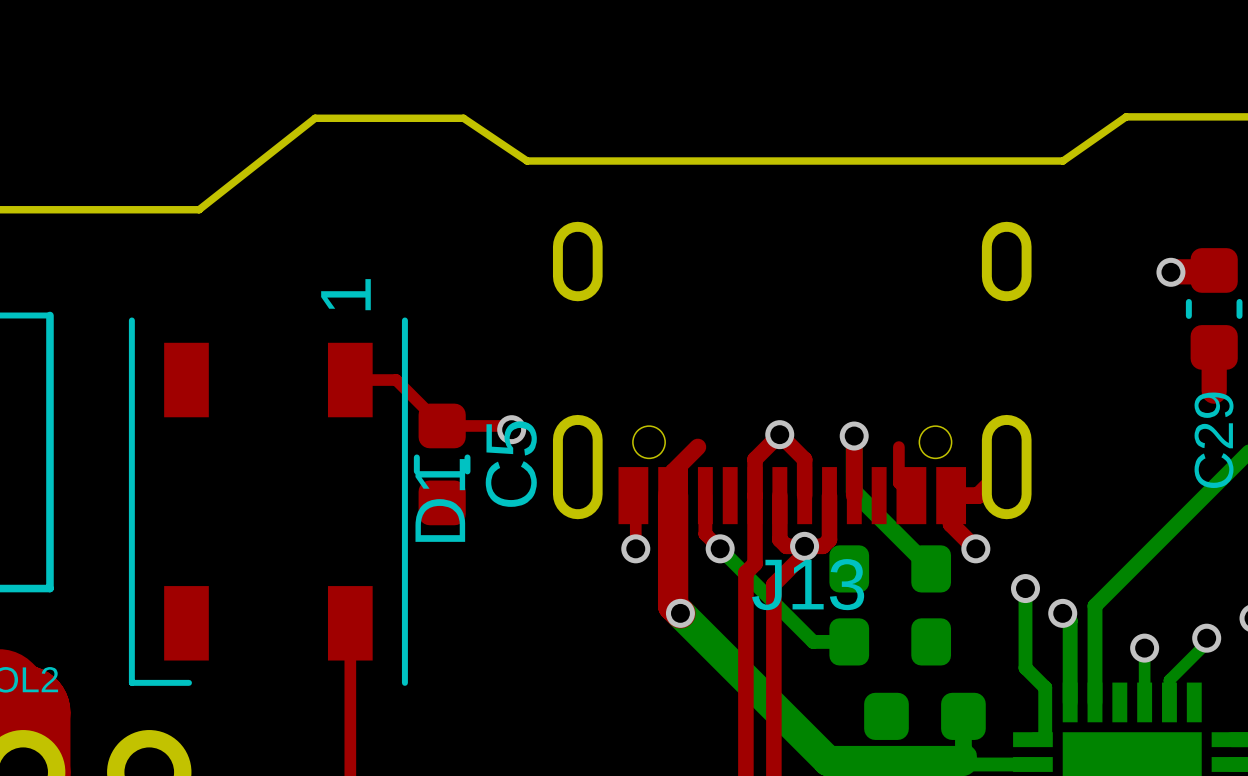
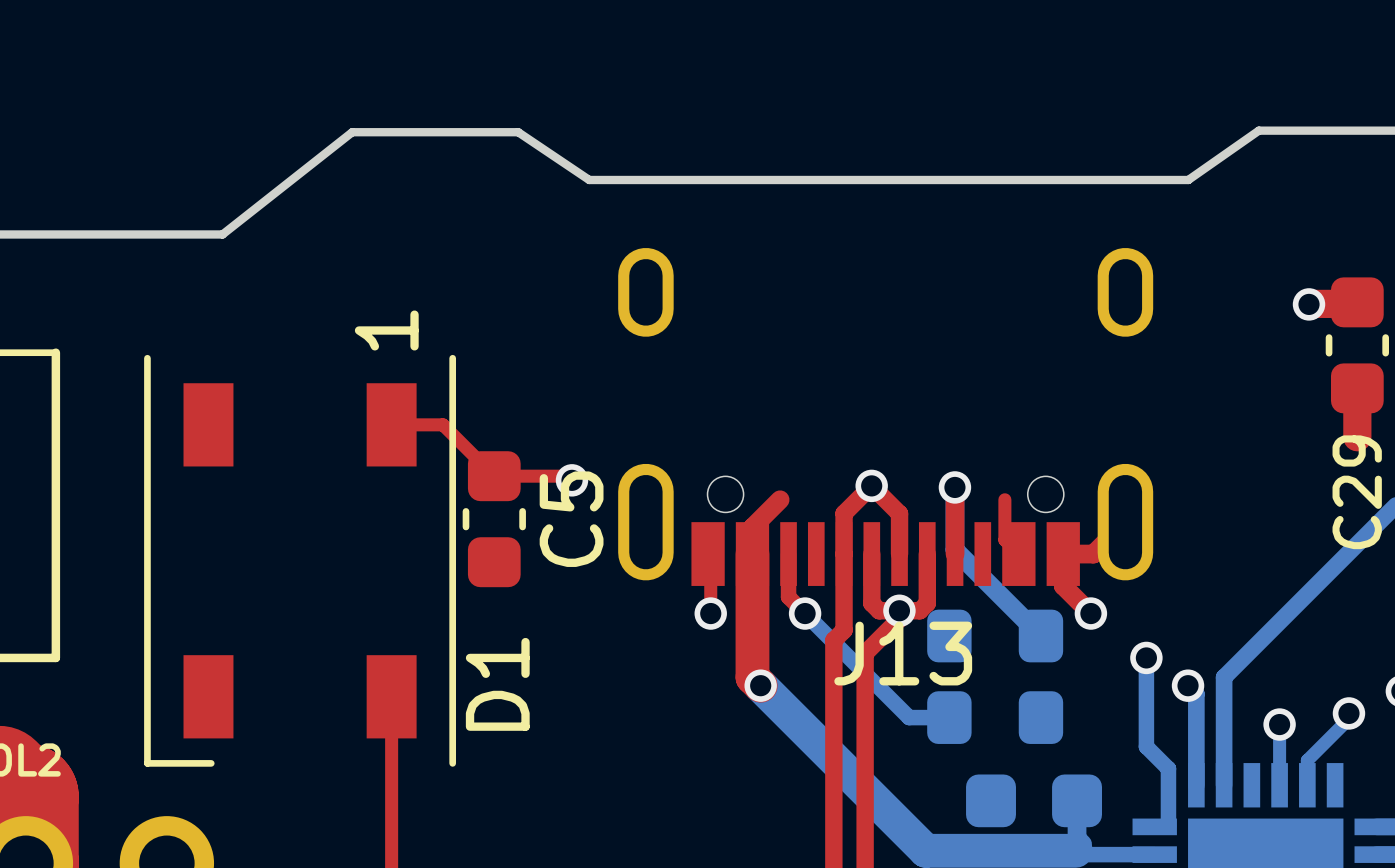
D1 name position: D1 (440, 500) -> D1 (497, 684)

